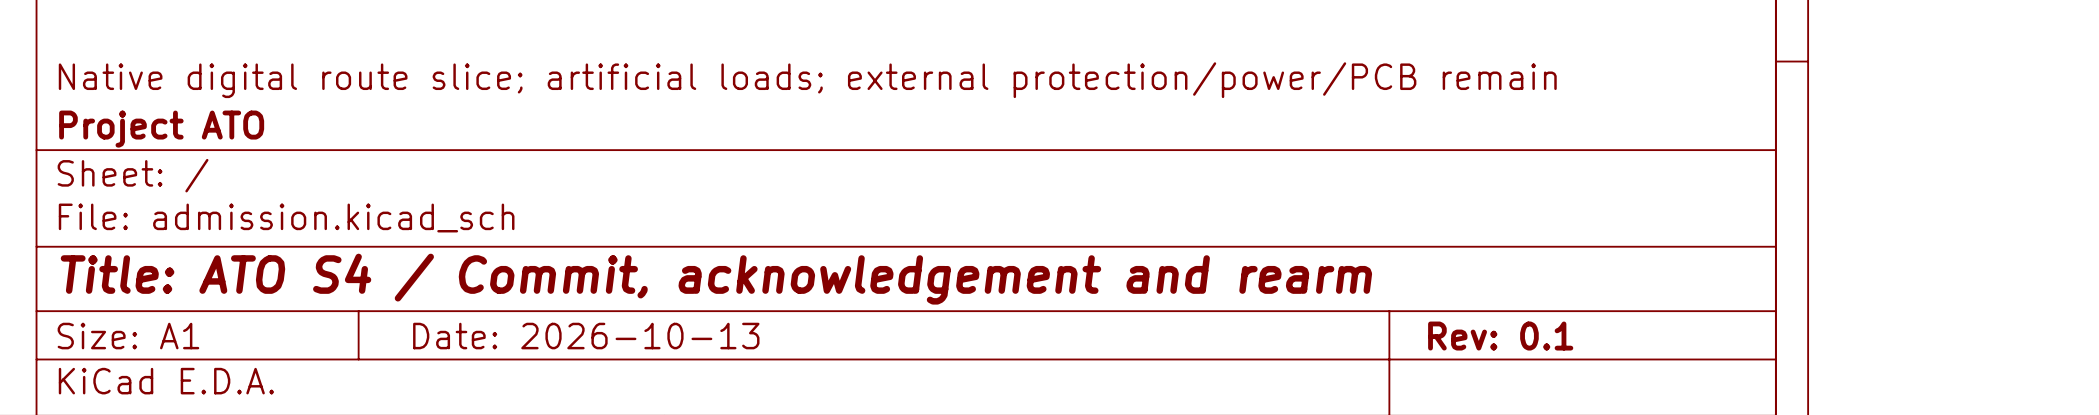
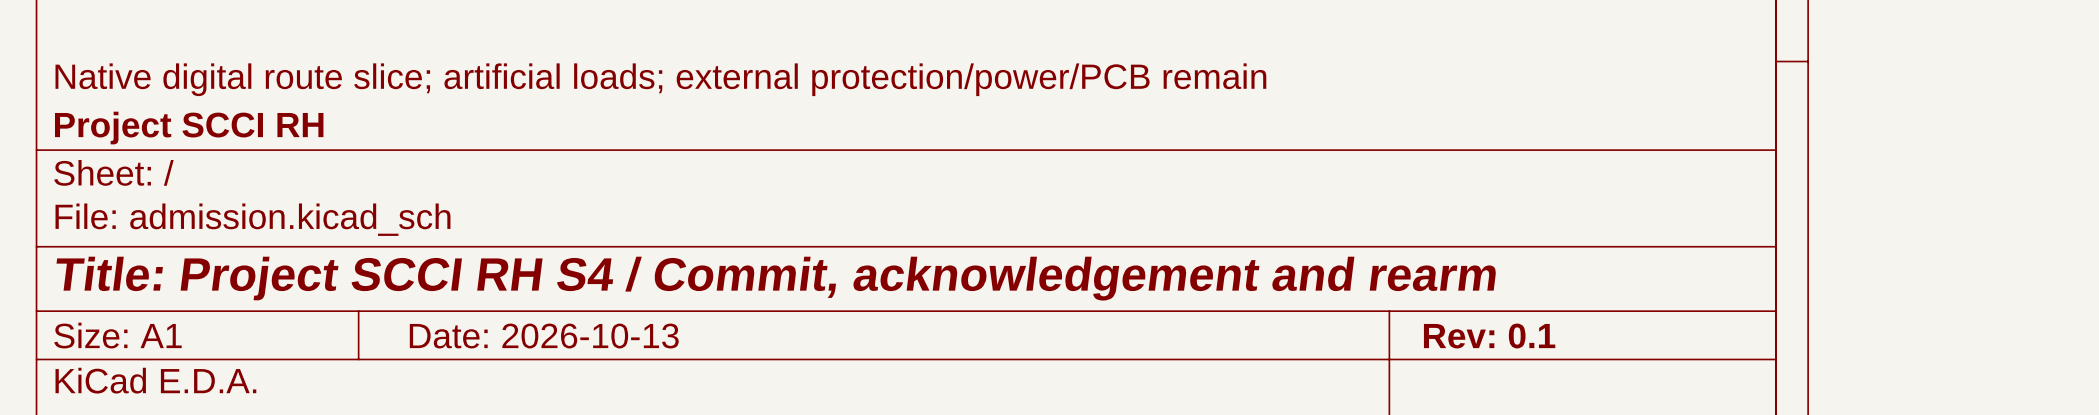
title block: Project ATO (161, 129) -> Project SCCI RH (189, 128)
title block: Title: ATO S4 / Commit, acknowledgement and rearm (716, 279) -> Title: Project SCCI RH S4 / Commit, acknowledgement and rearm (776, 278)

